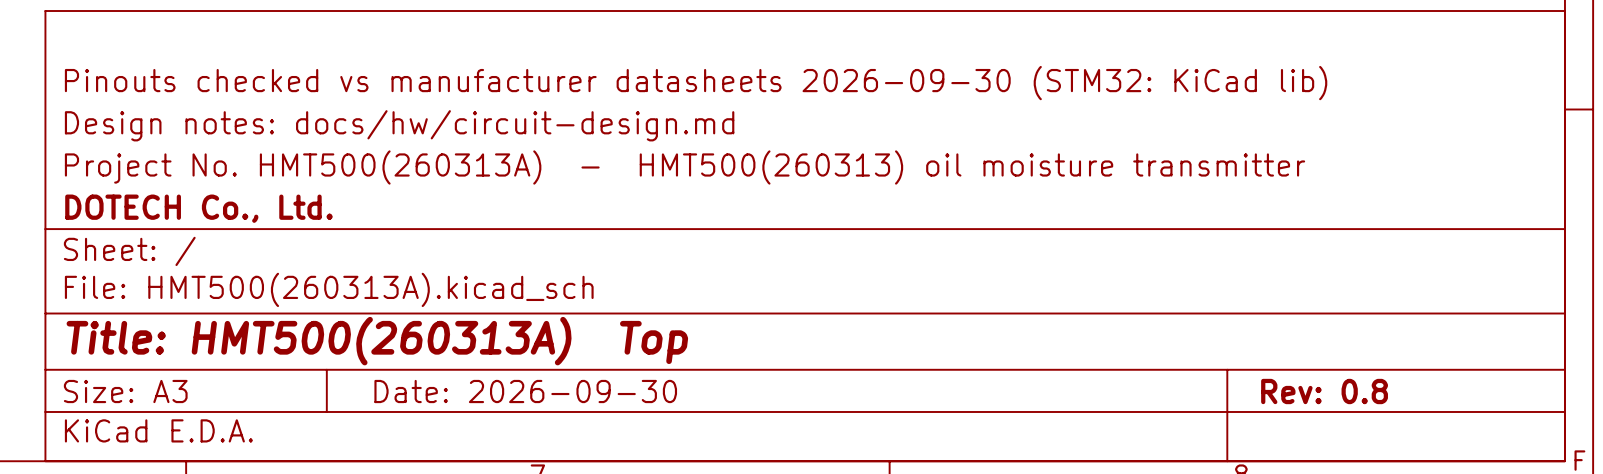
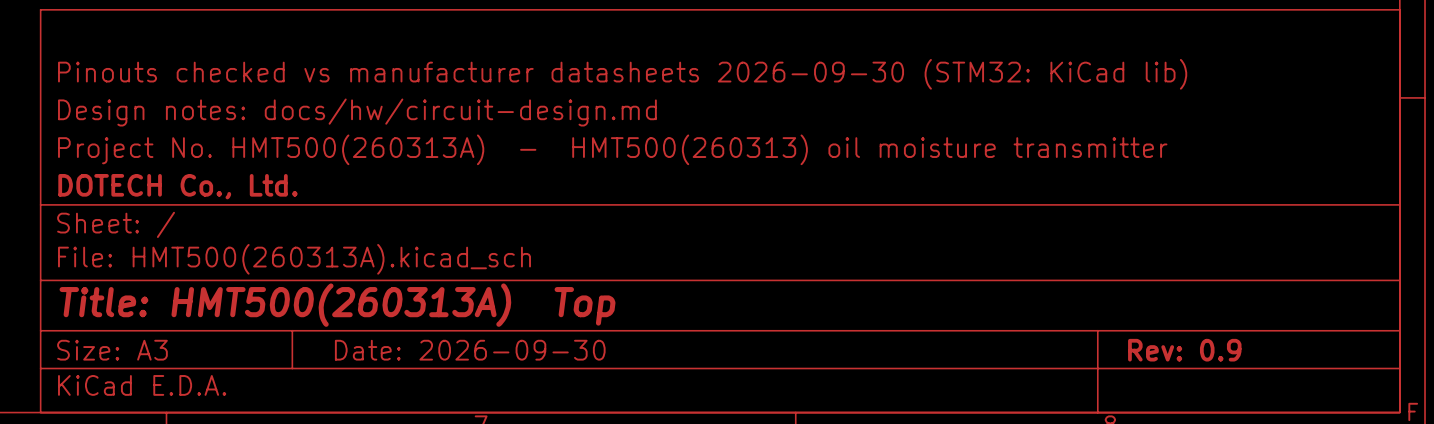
title block: Rev: 0.8 (1324, 391) -> Rev: 0.9 (1184, 350)

